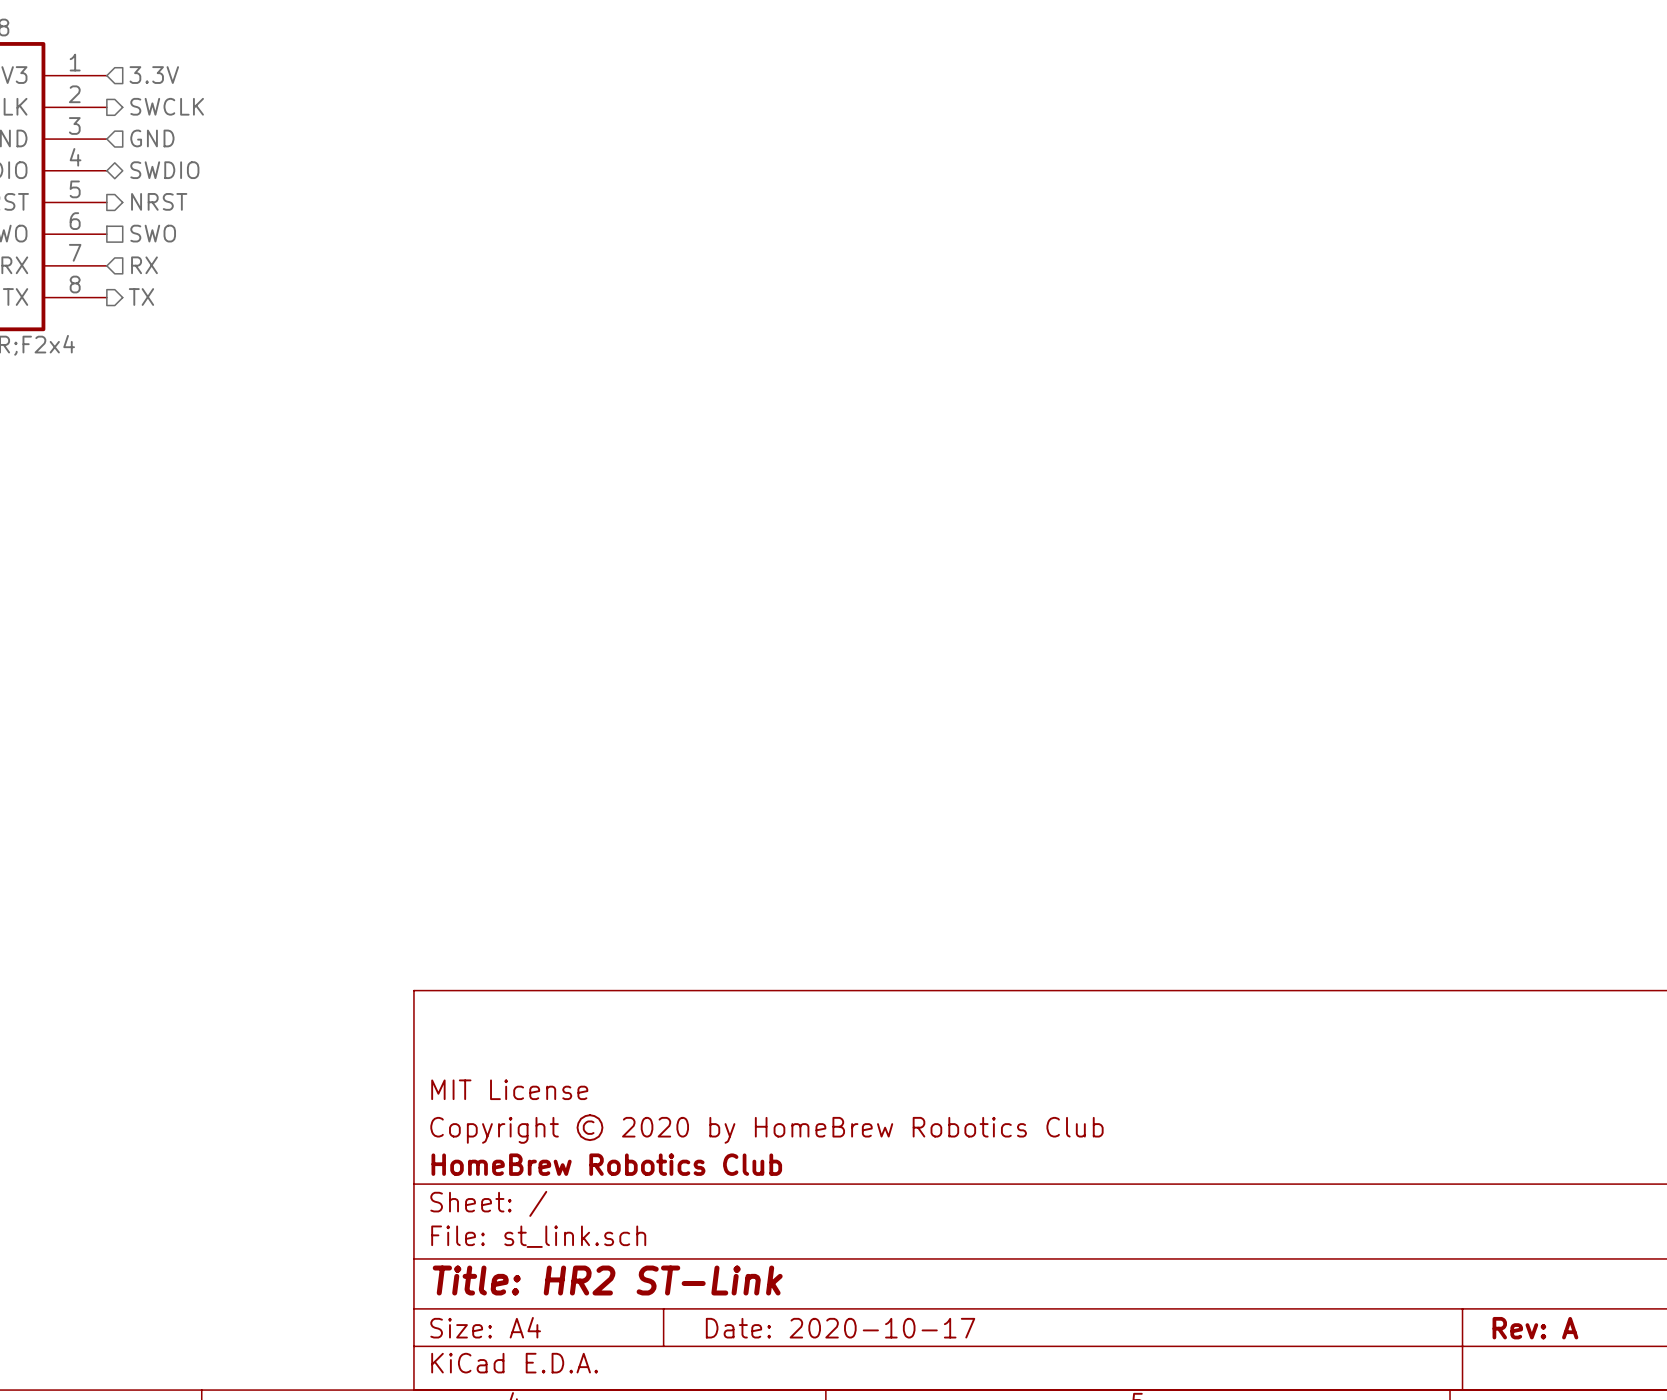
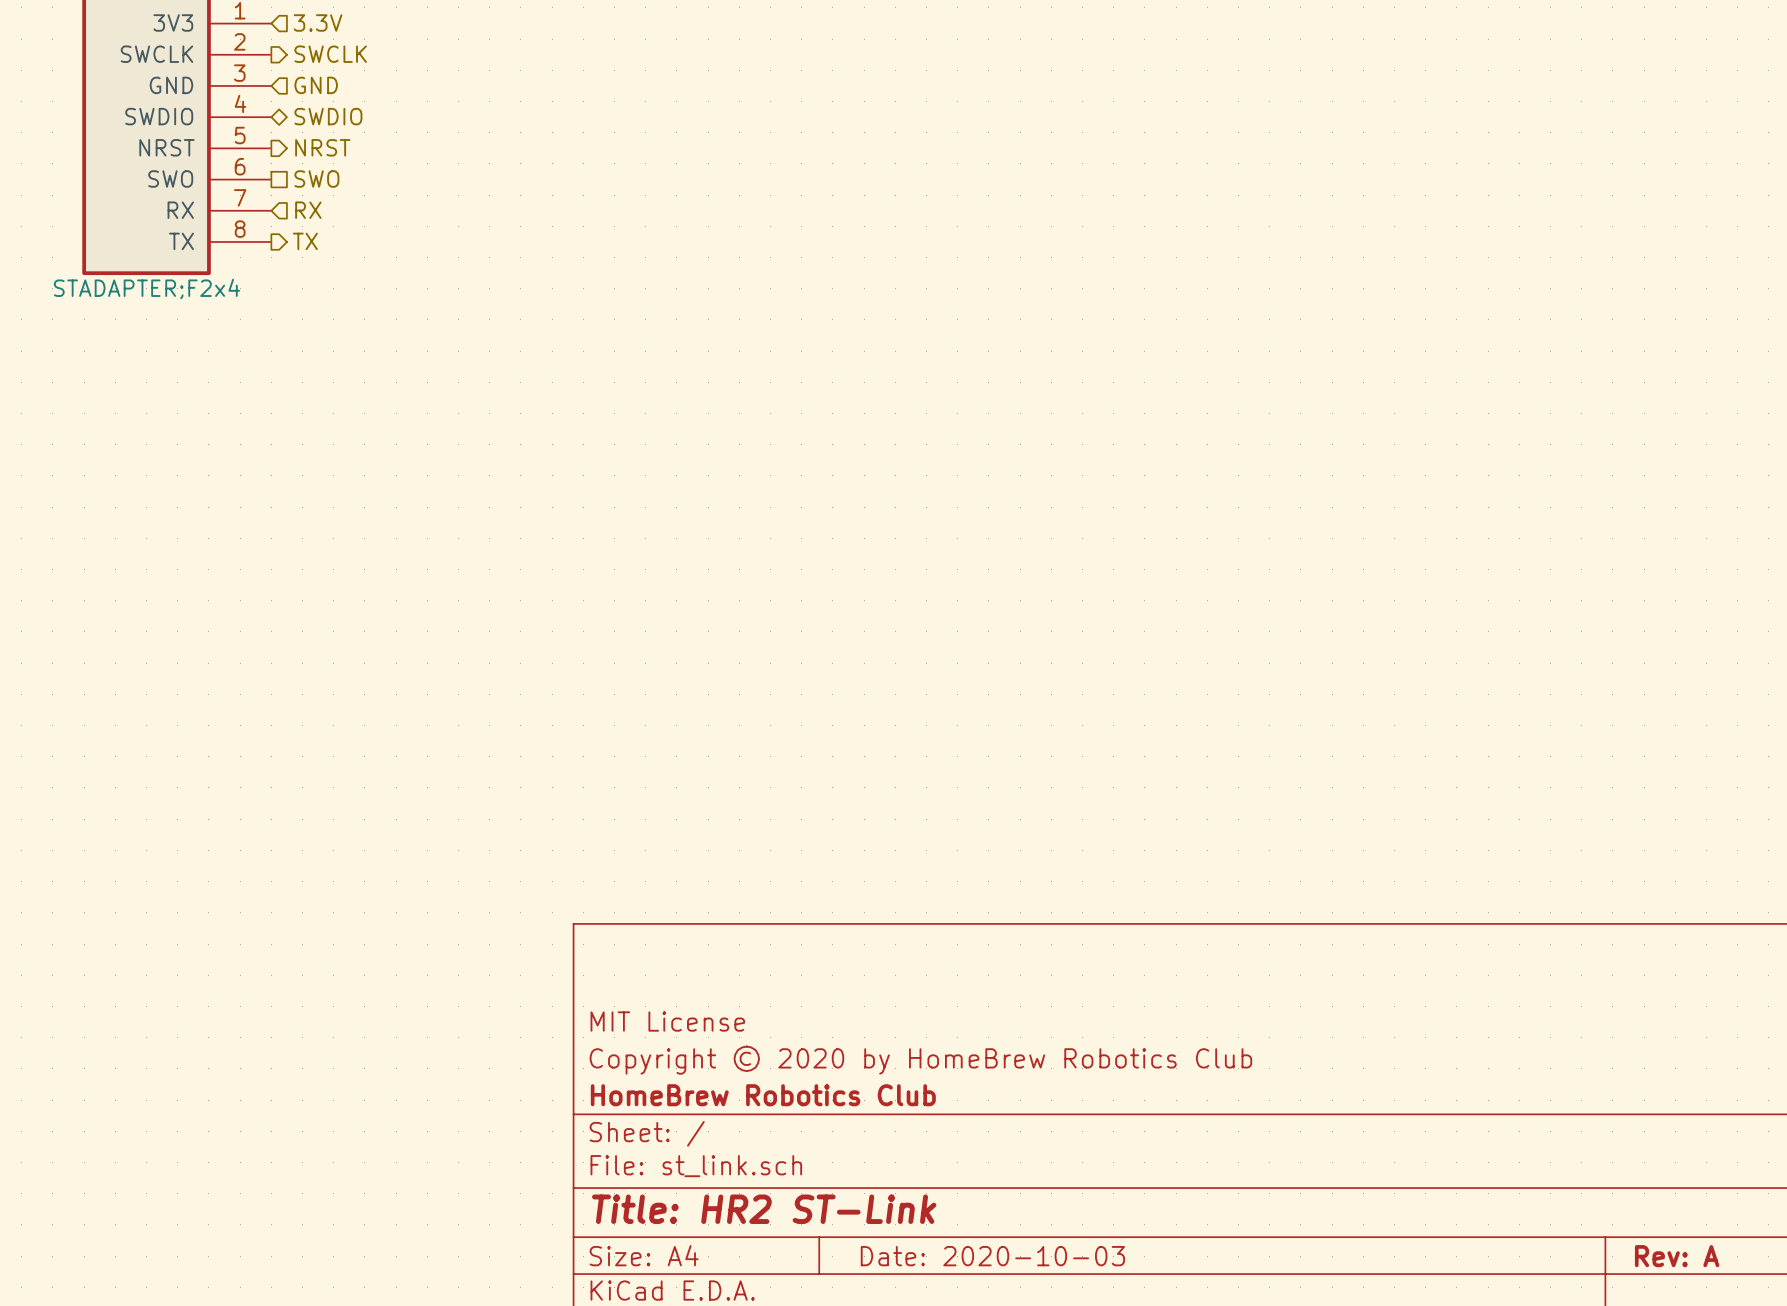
title block: Date: 2020-10-17 (840, 1328) -> Date: 2020-10-03 (992, 1256)

